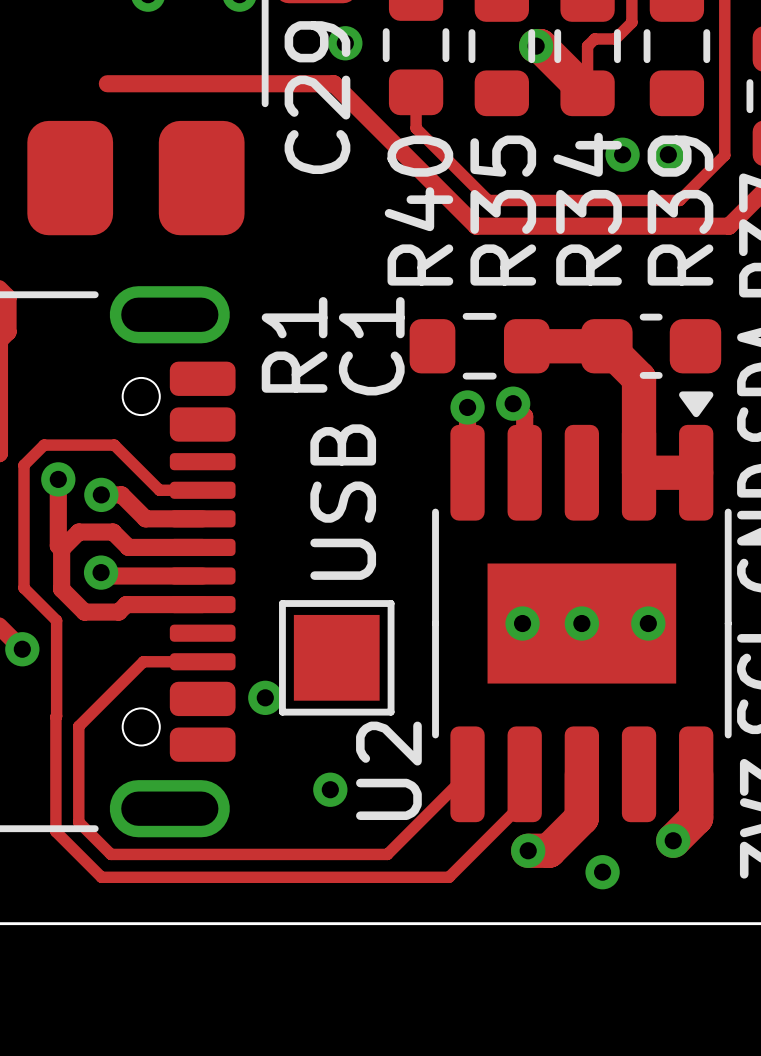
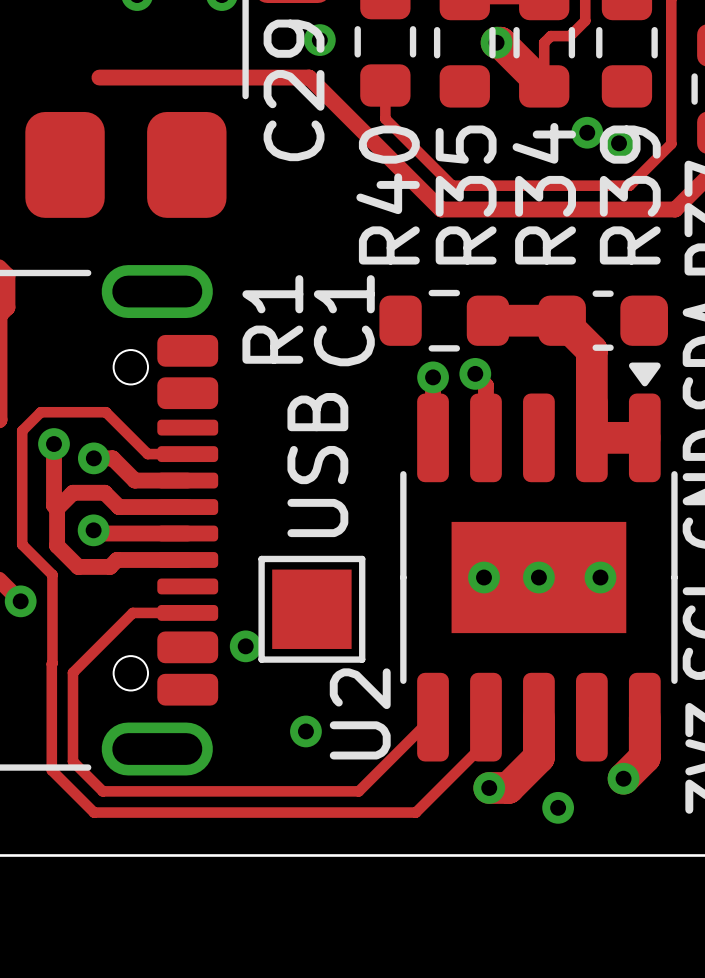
via position: (622, 154) -> (587, 132)

